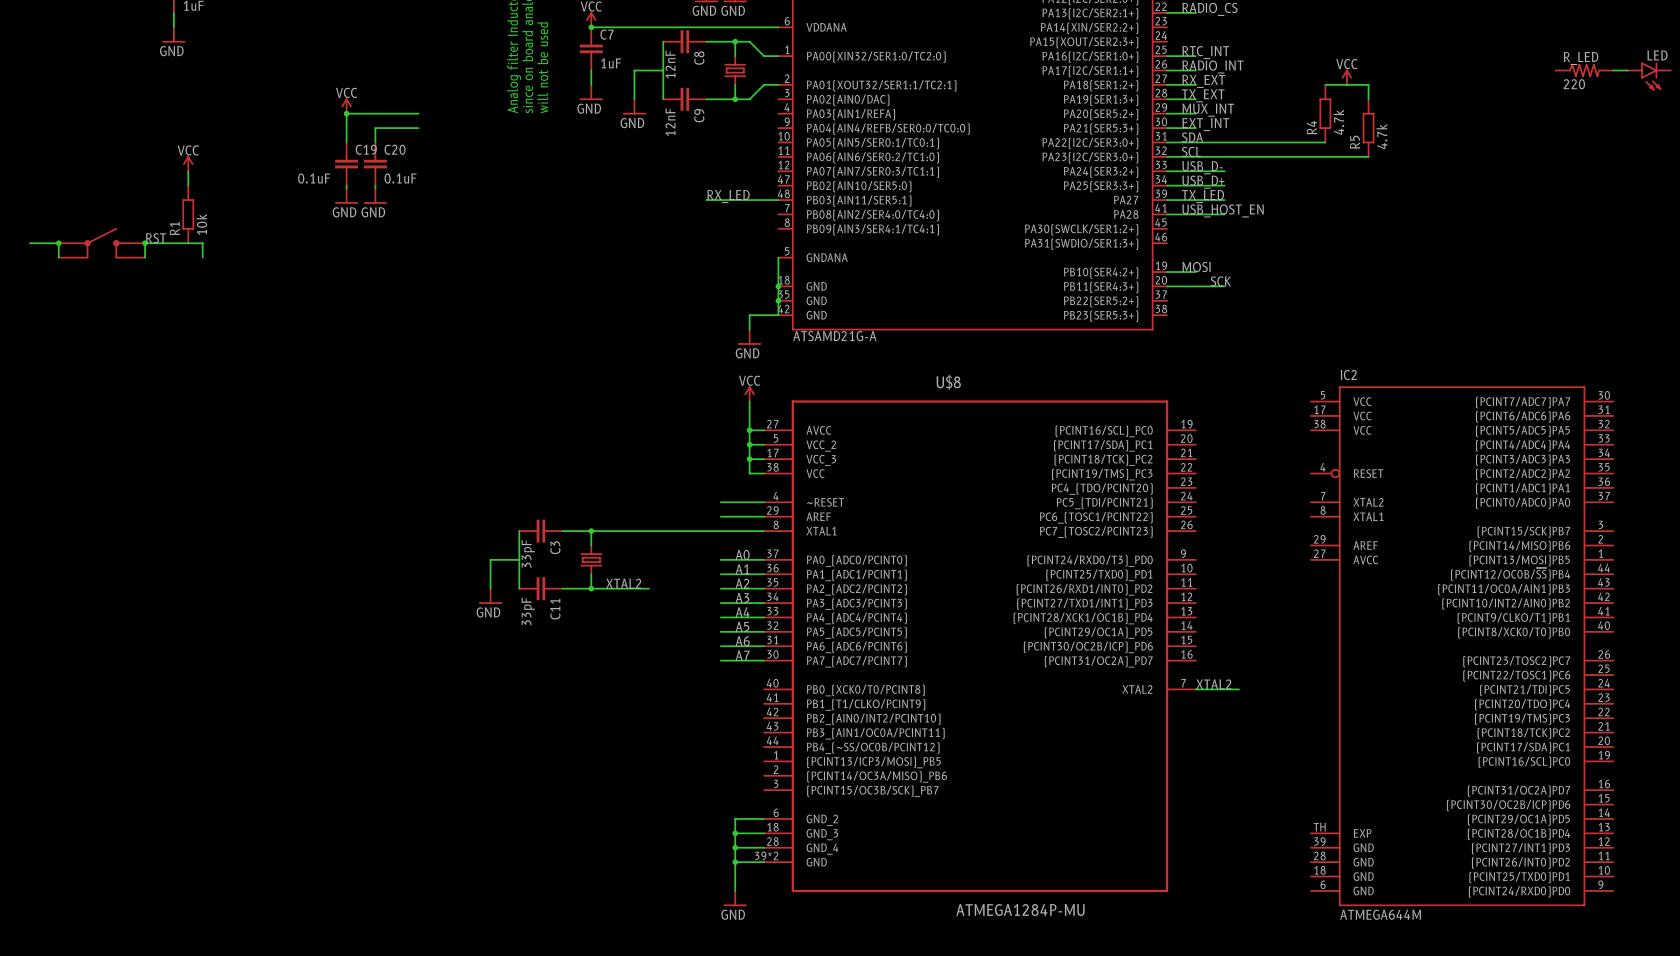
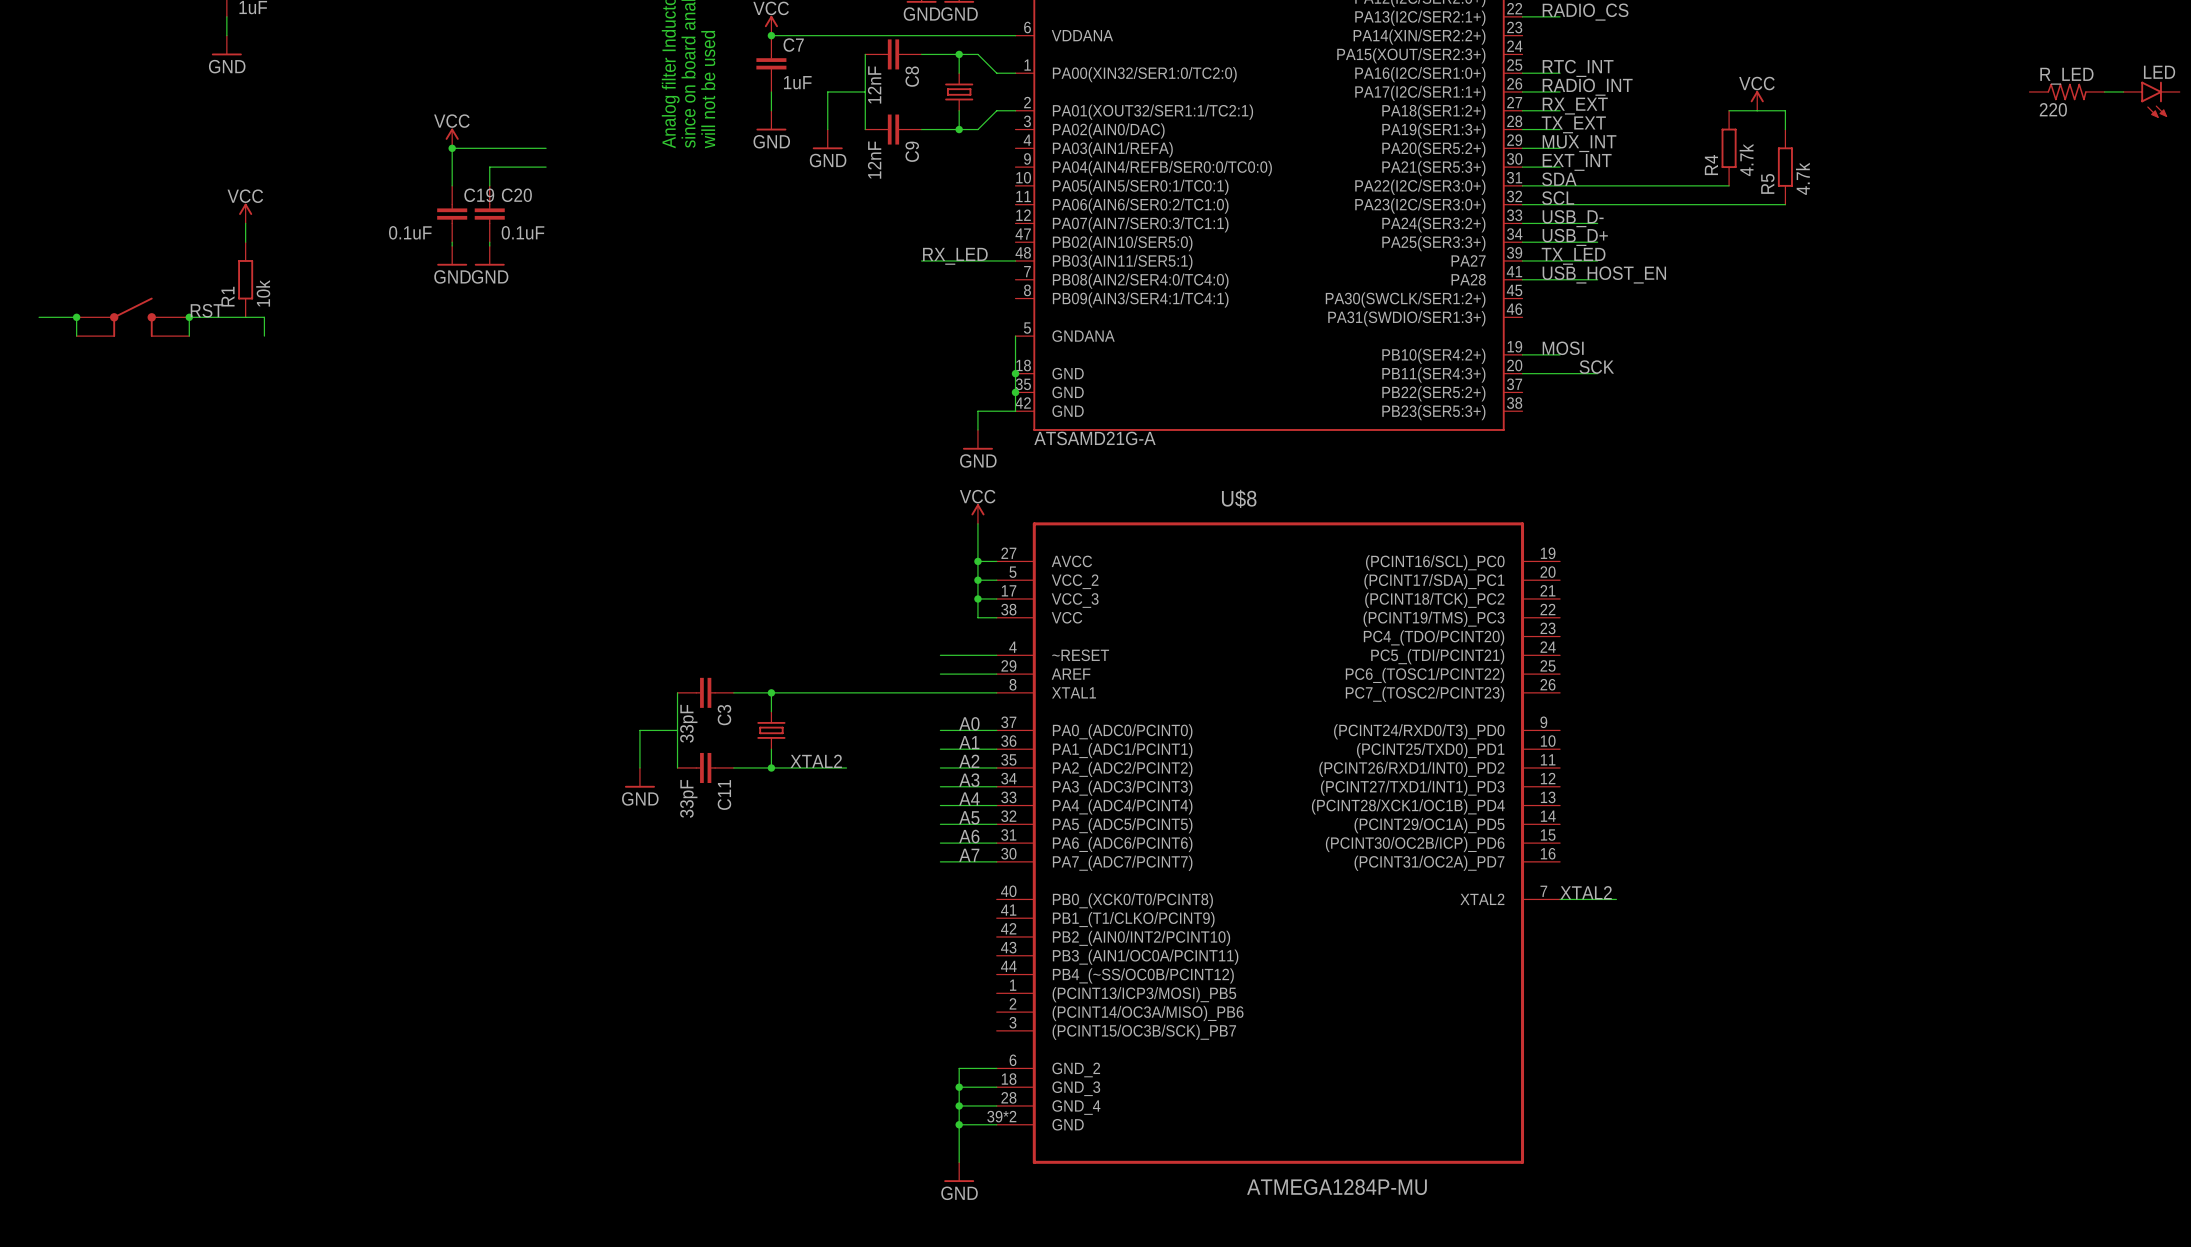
IC2: ATMEGA644M (1462, 646) -> none

